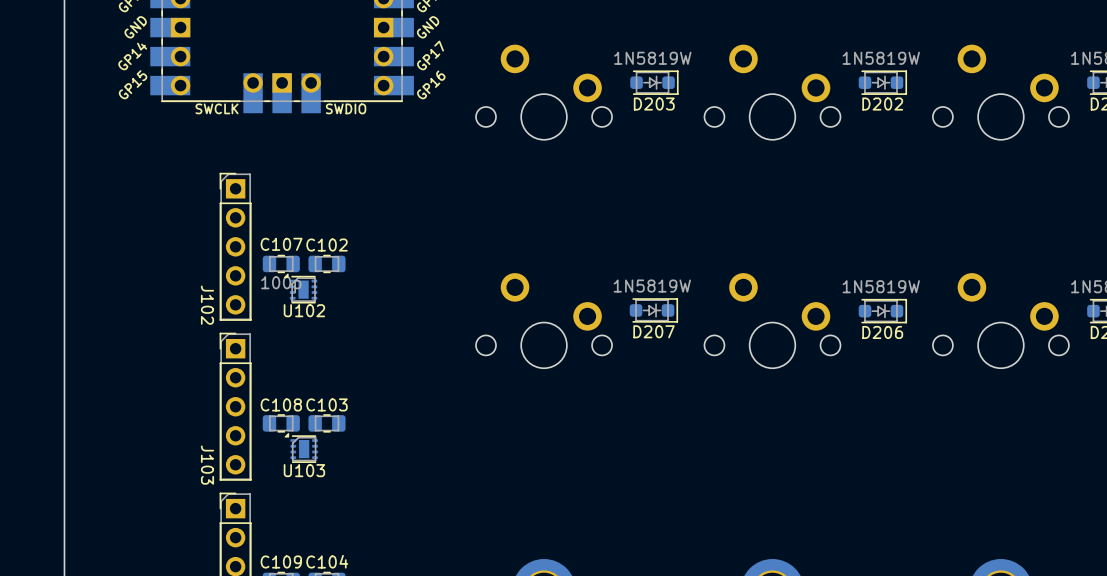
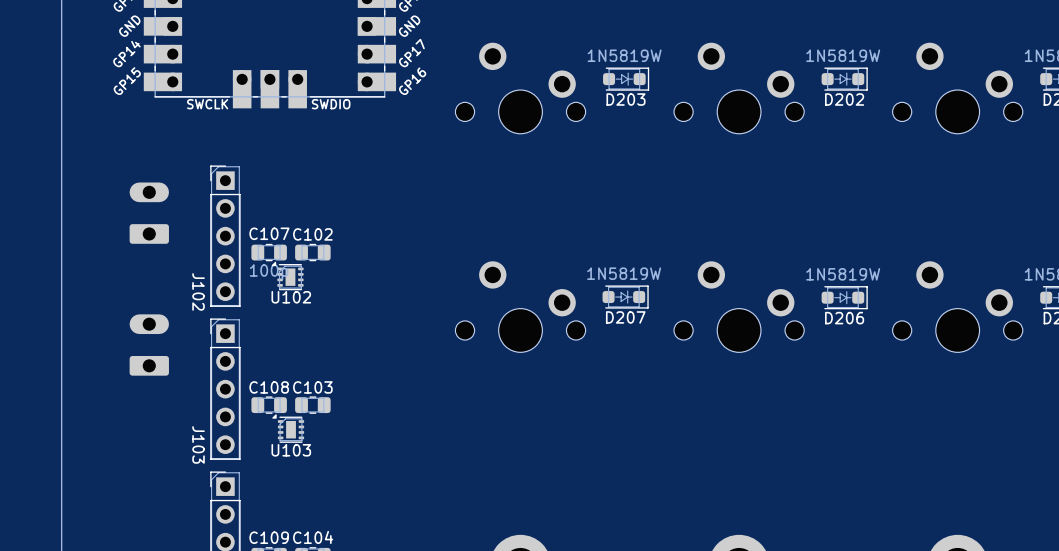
part: none -> (149, 213)
part: none -> (149, 345)

